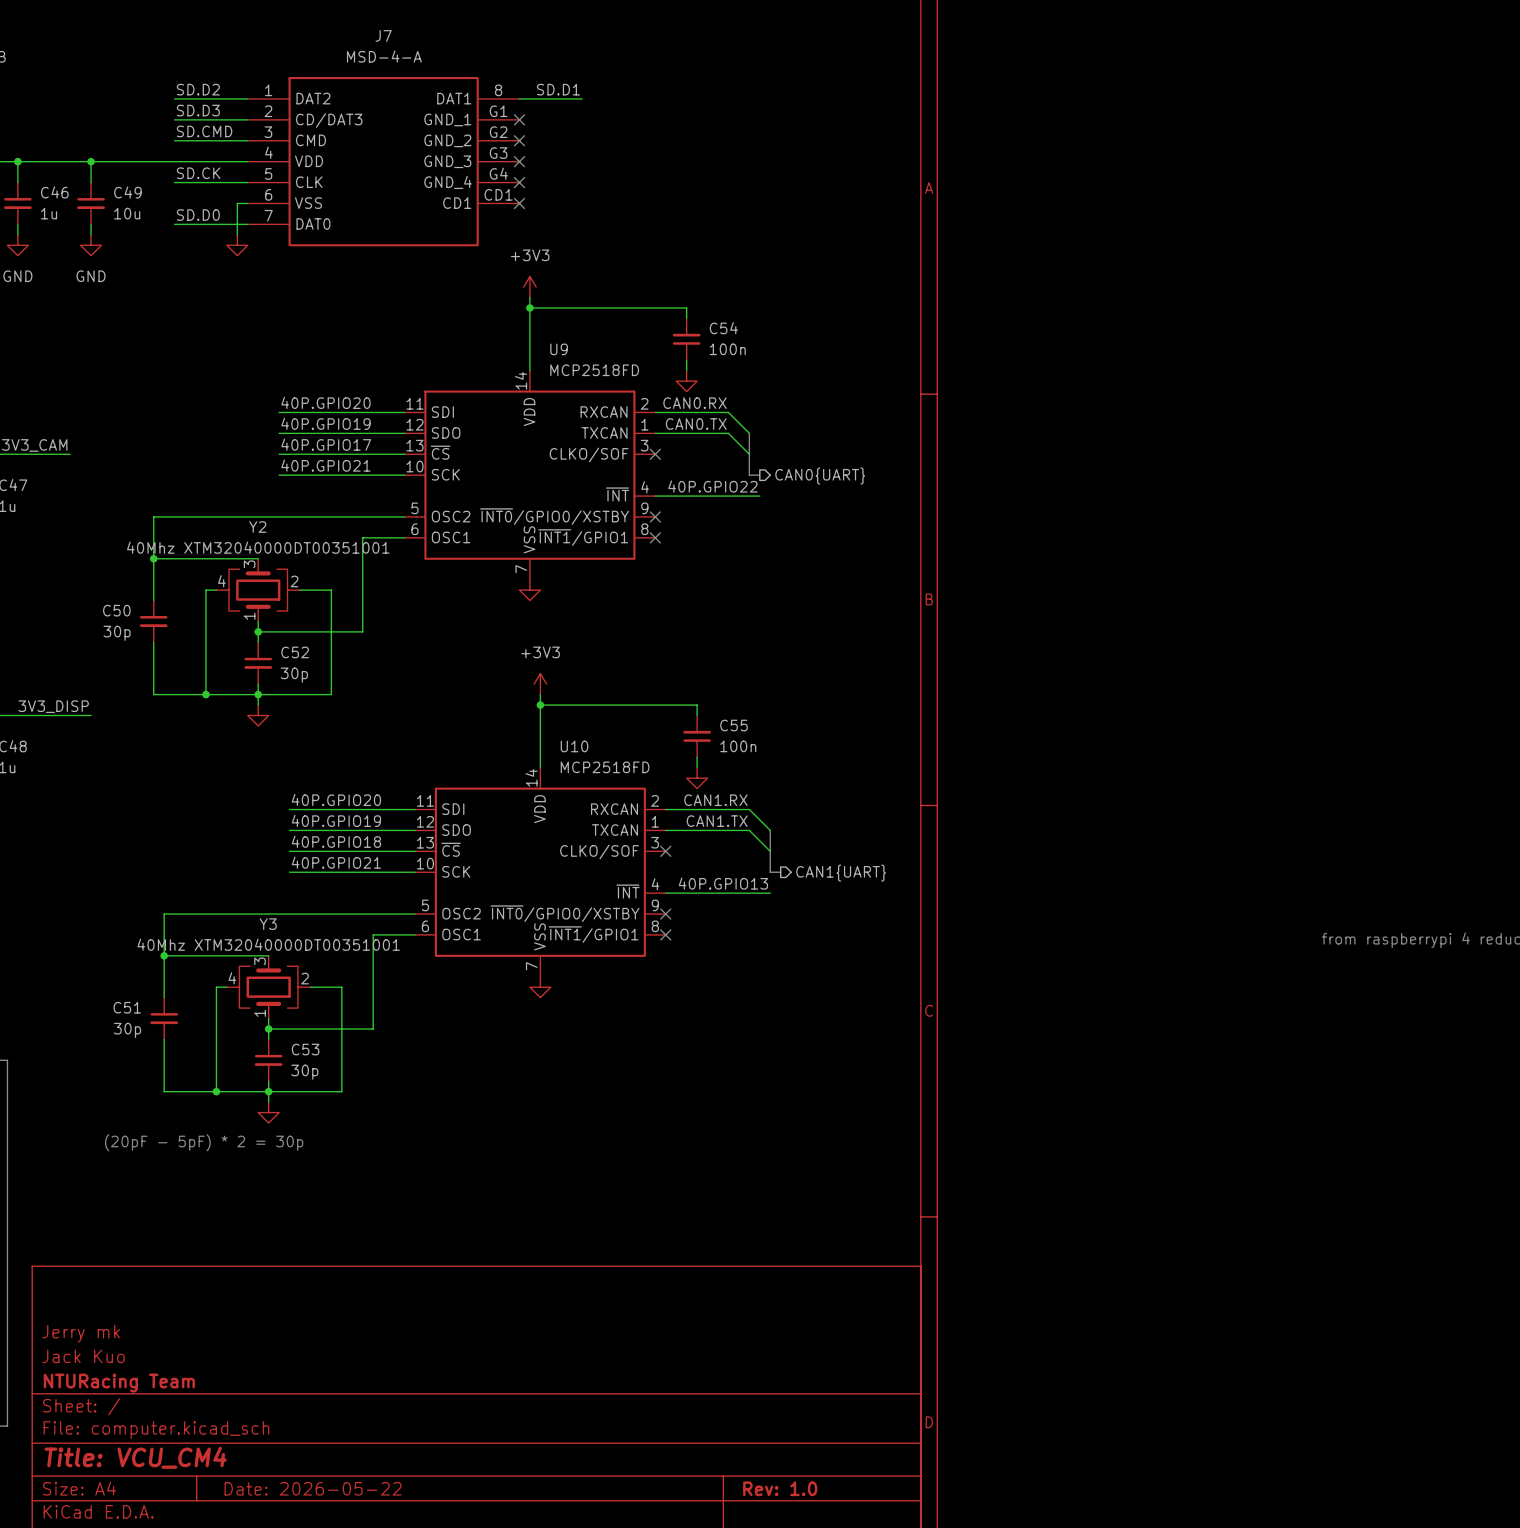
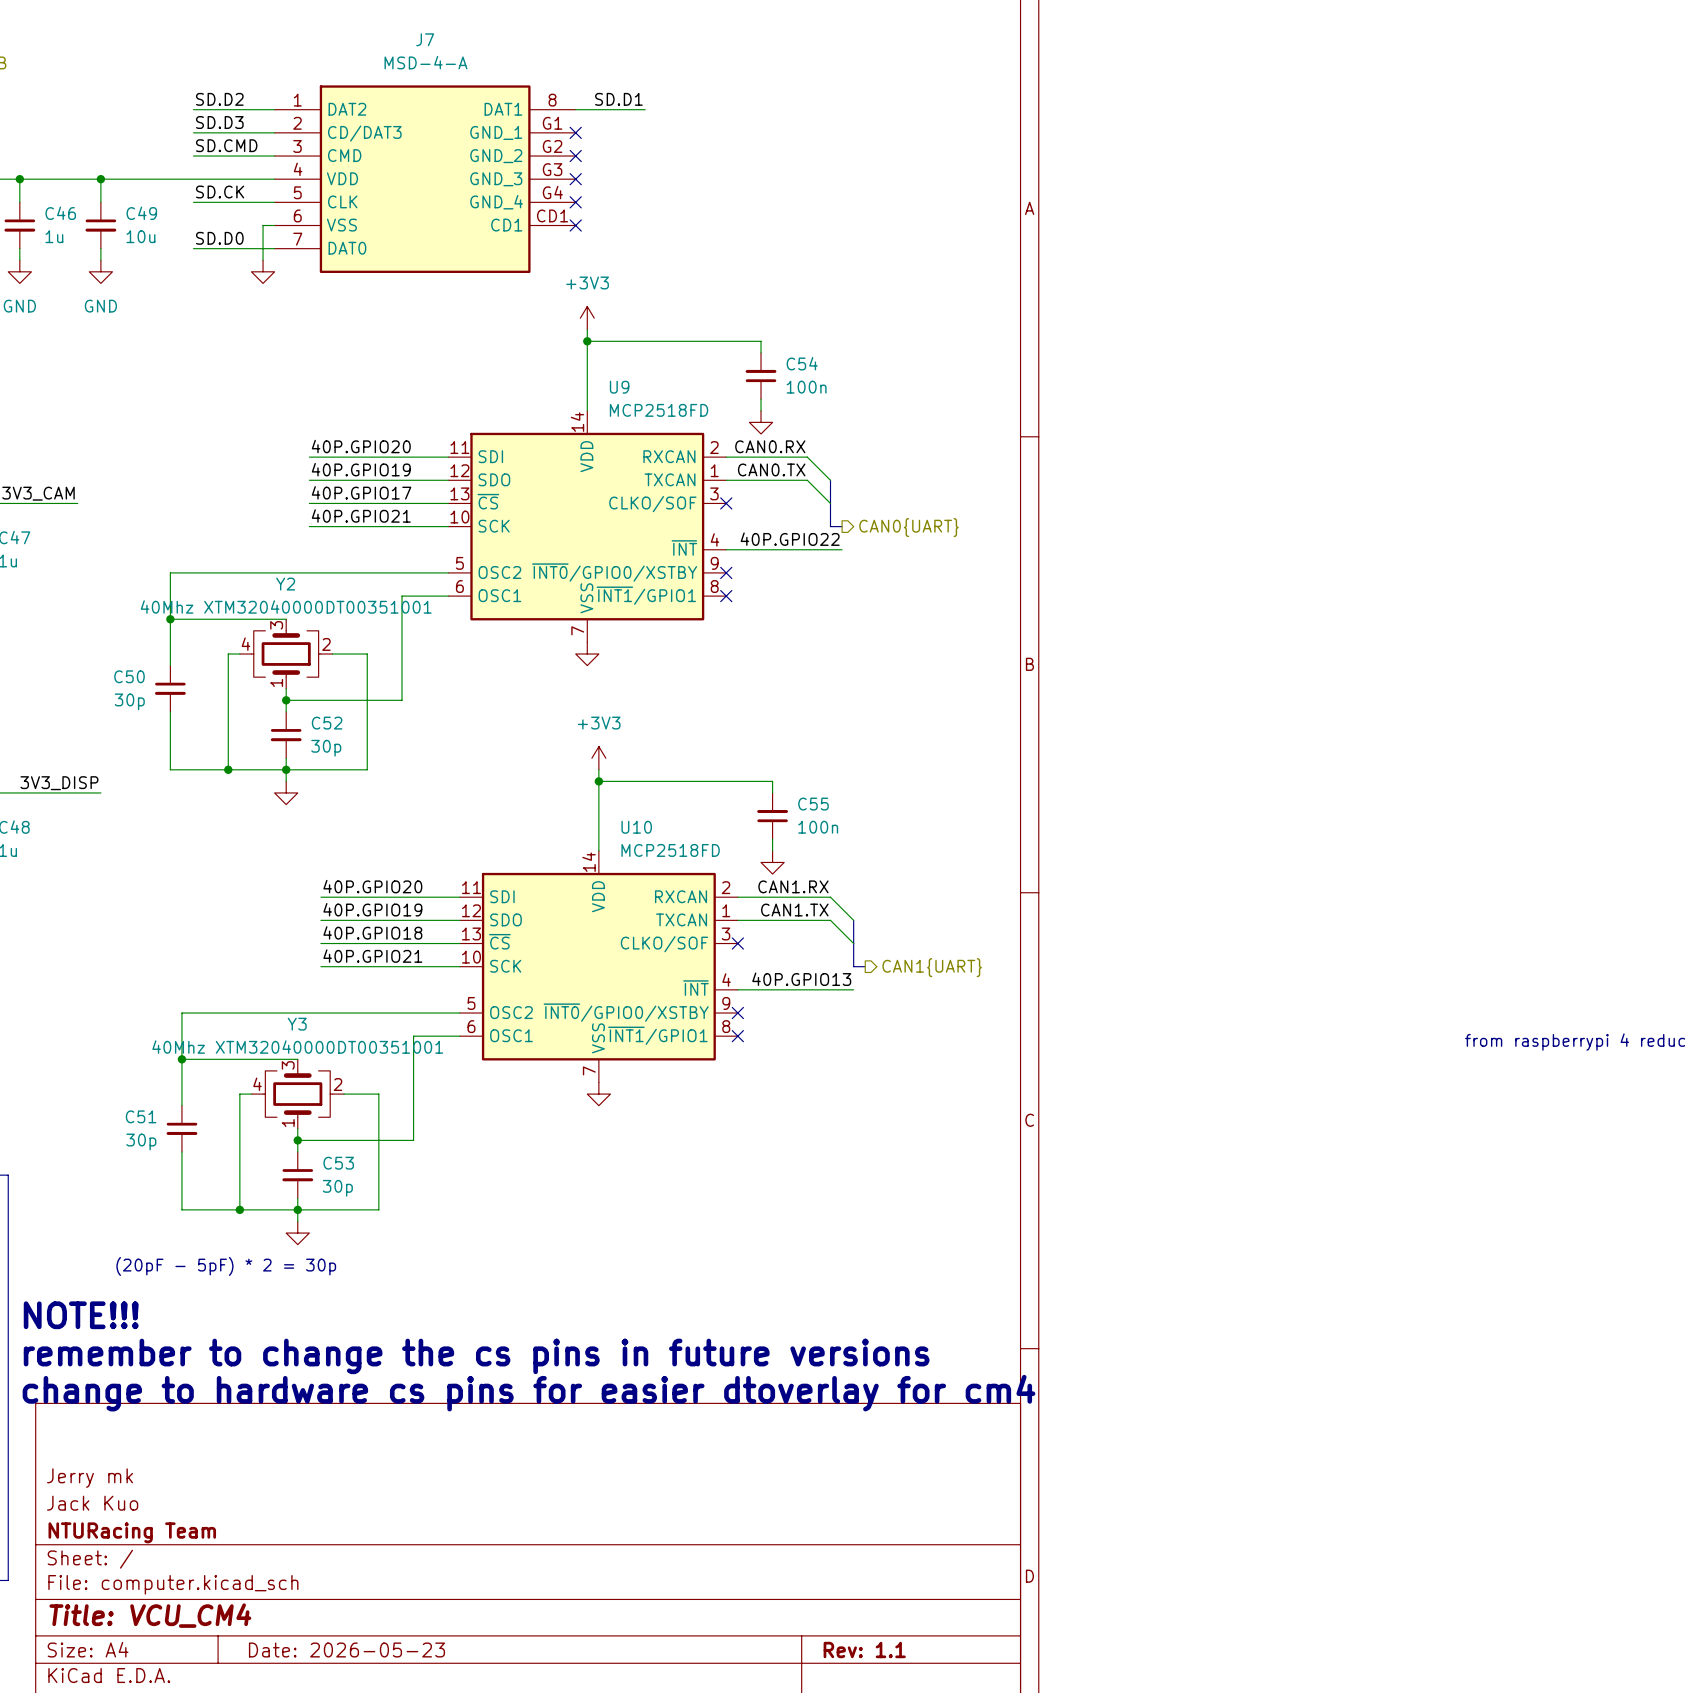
text: none -> NOTE!!! (81, 1315)
text: none -> remember to change the cs pins in future versions (476, 1356)
text: none -> change to hardware cs pins for easier dtoverlay for cm4 (529, 1393)
title block: Date: 2026-05-22 (313, 1488) -> Date: 2026-05-23 (346, 1650)
title block: Rev: 1.0 (780, 1488) -> Rev: 1.1 (864, 1650)

